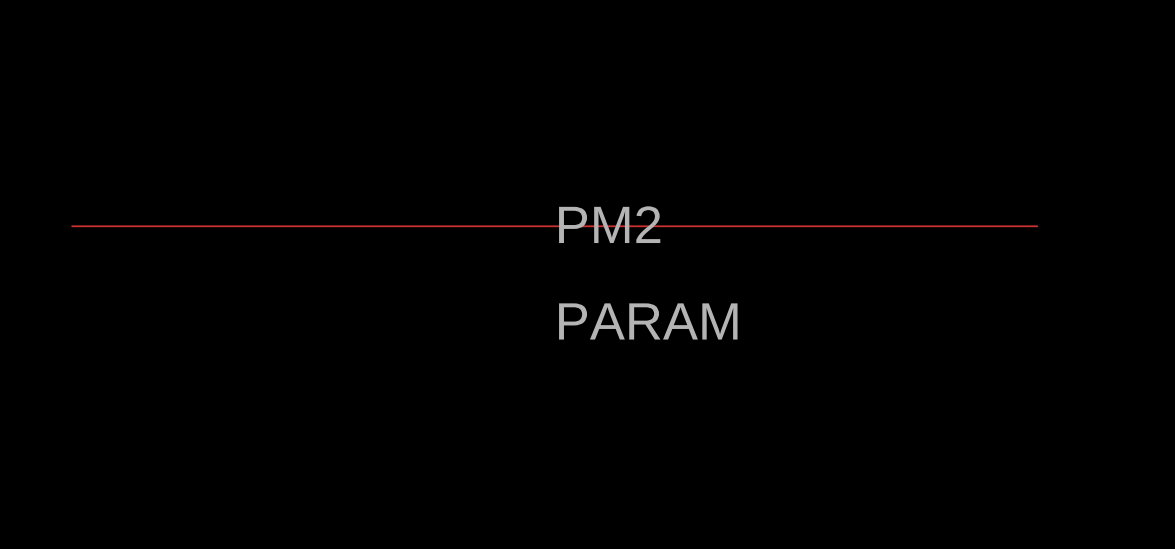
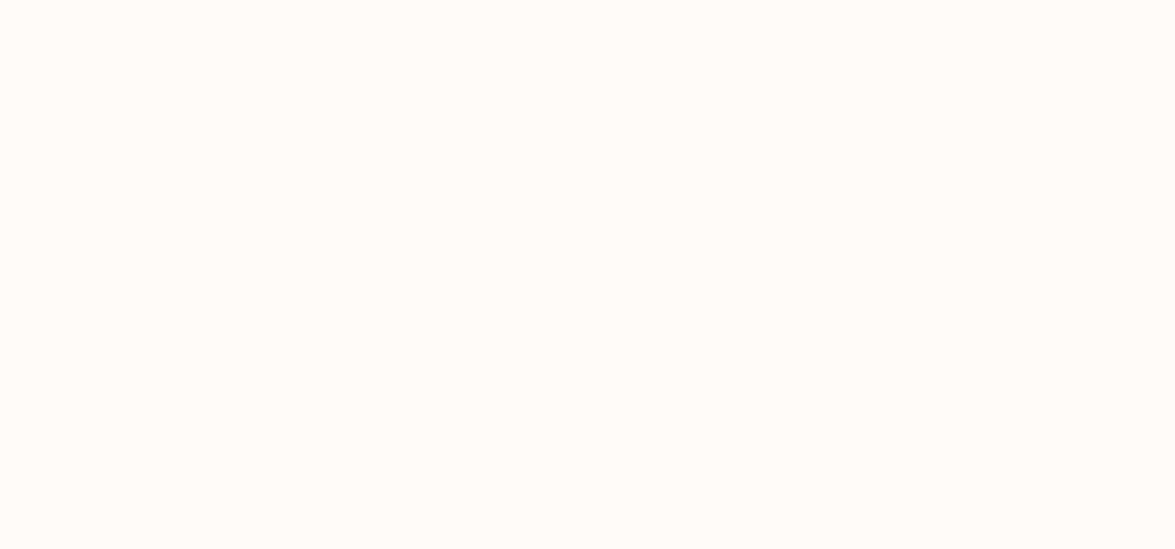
PM2: PARAM (554, 226) -> none

